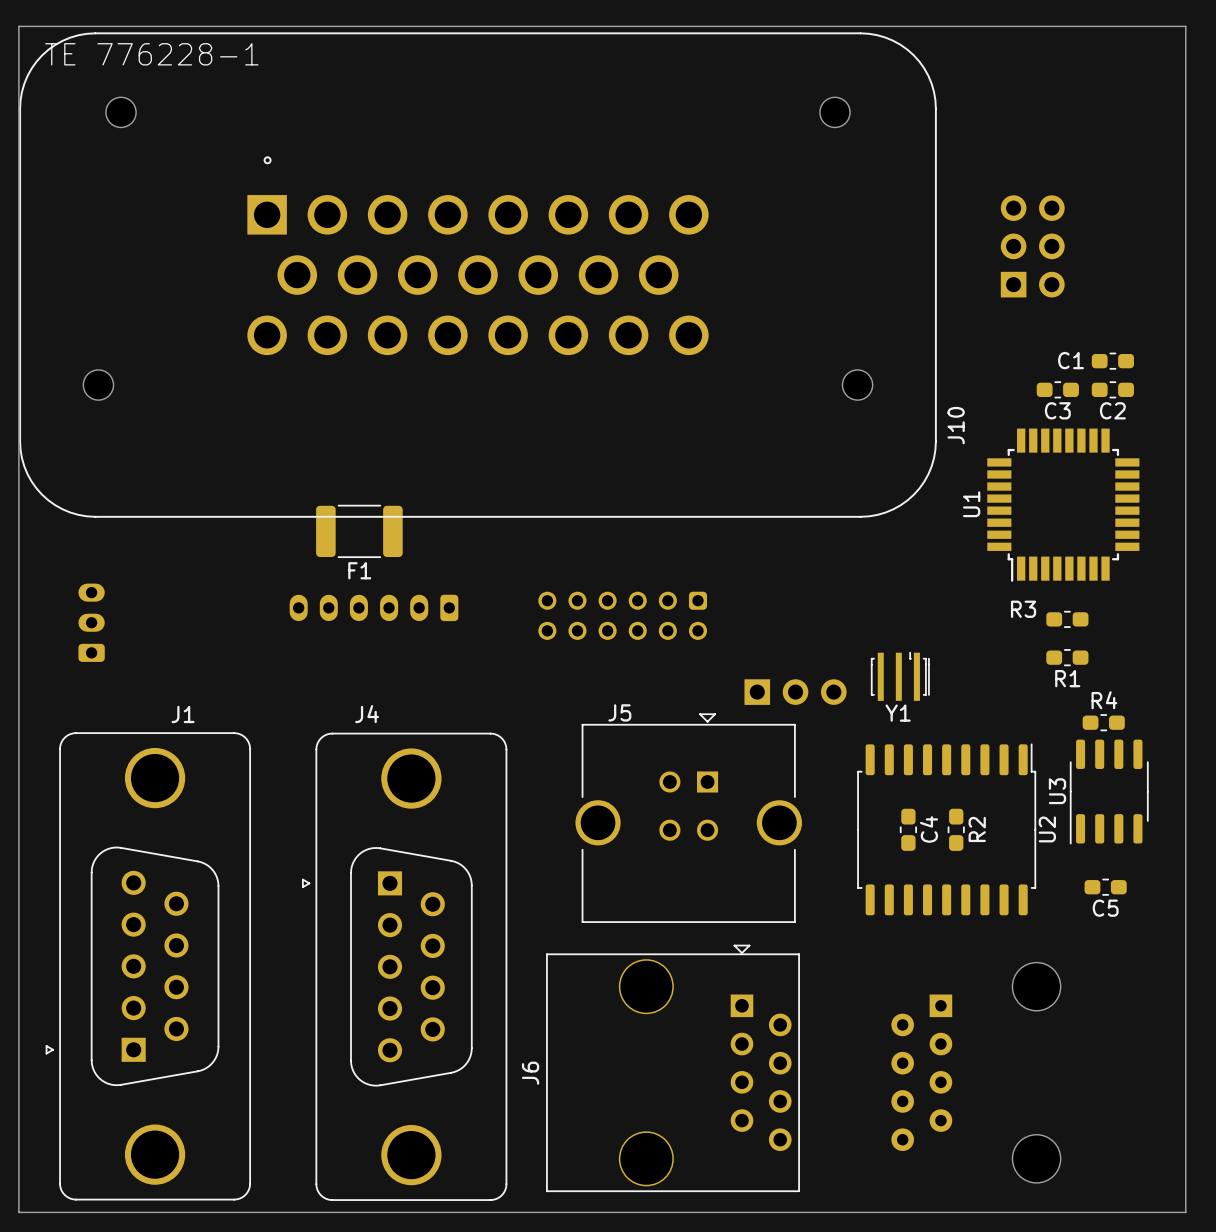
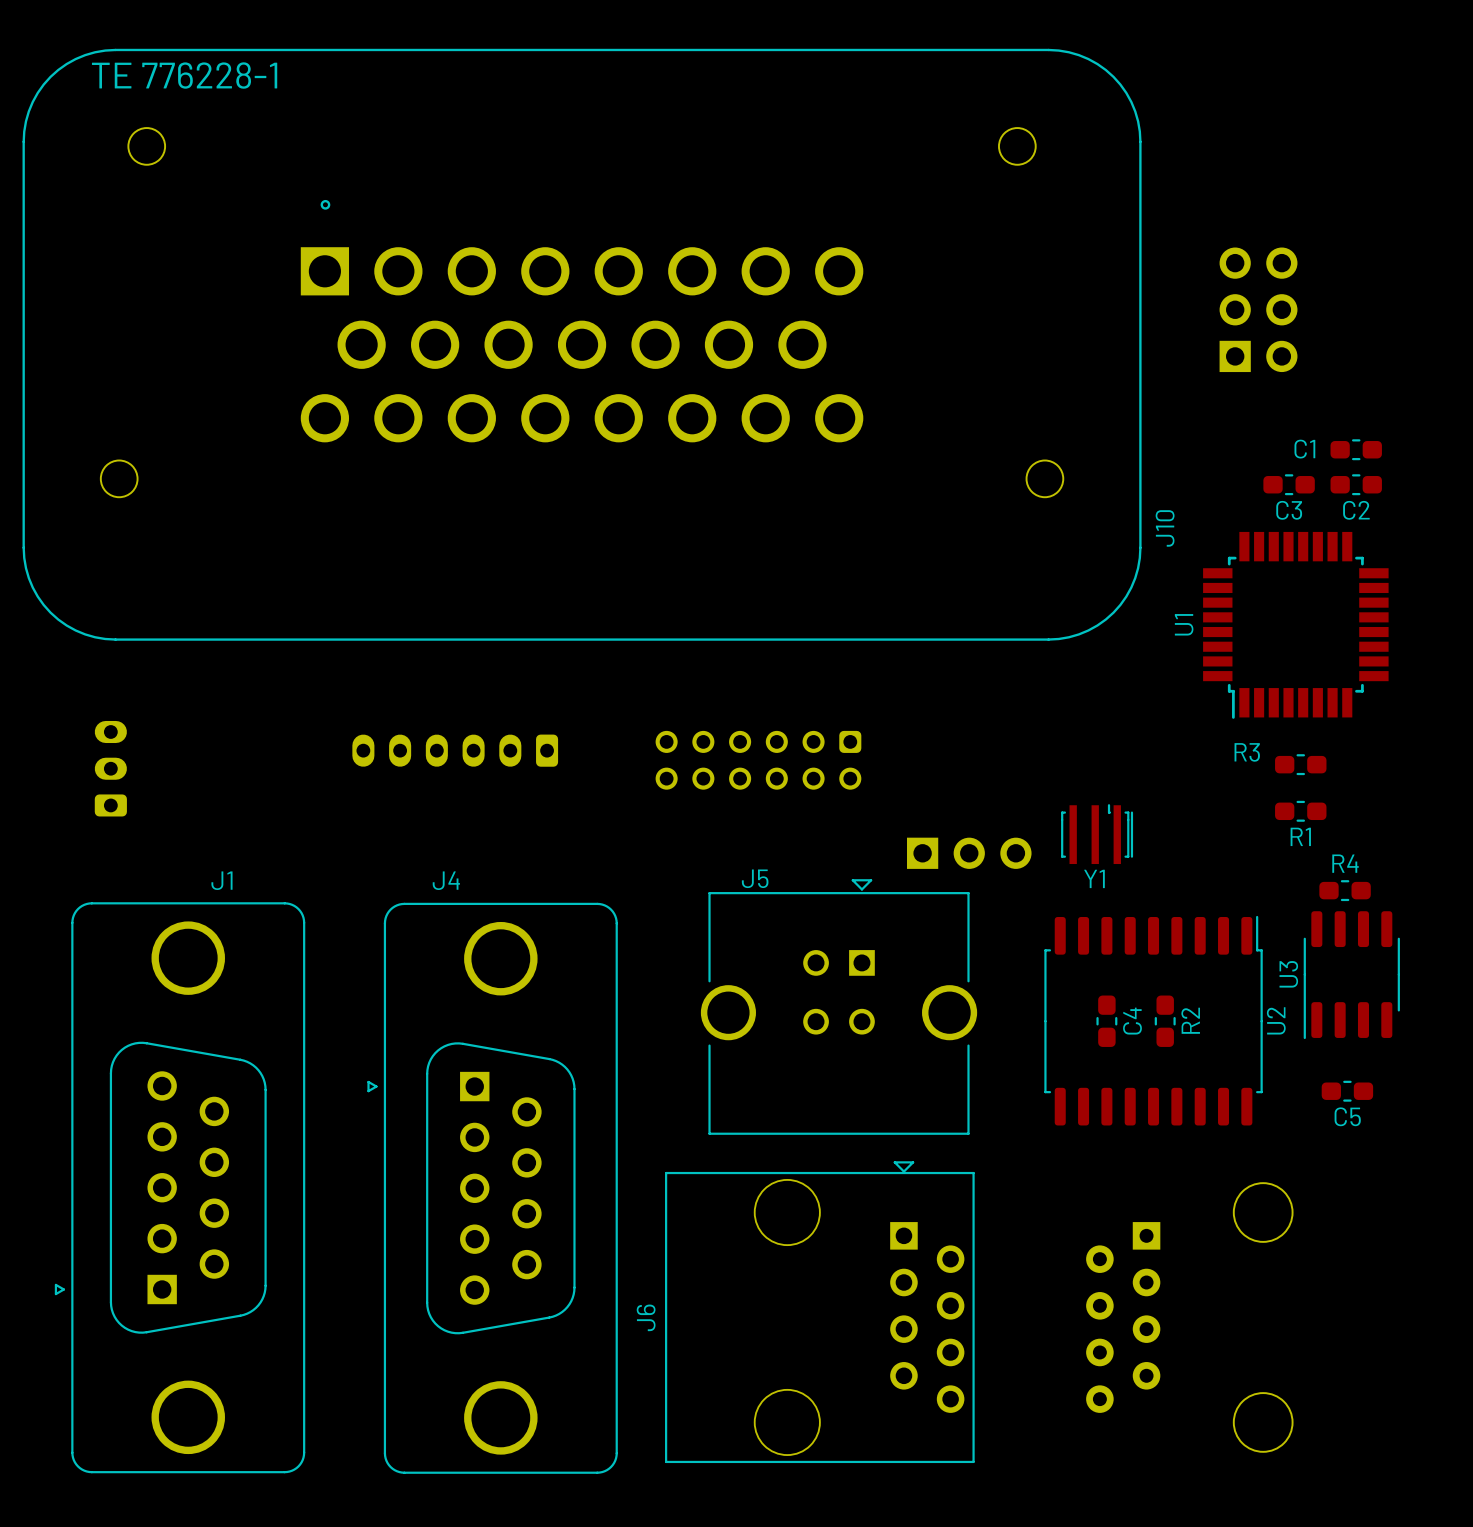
board edge: (18, 26) (1185, 26) (1185, 1212) (18, 1212) (18, 26) -> none
F1: (359, 531) -> none

